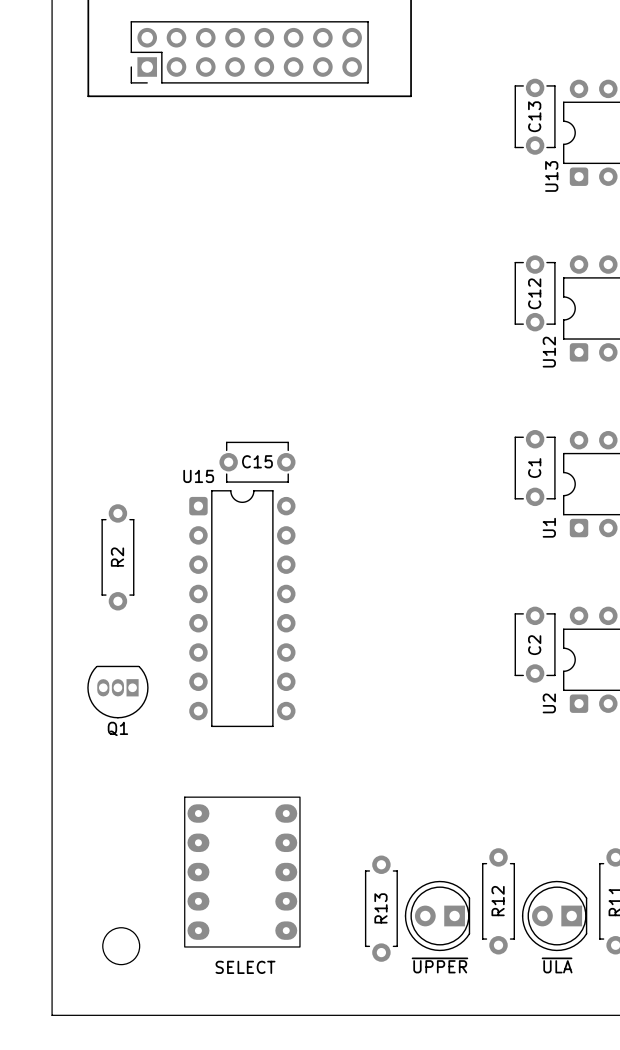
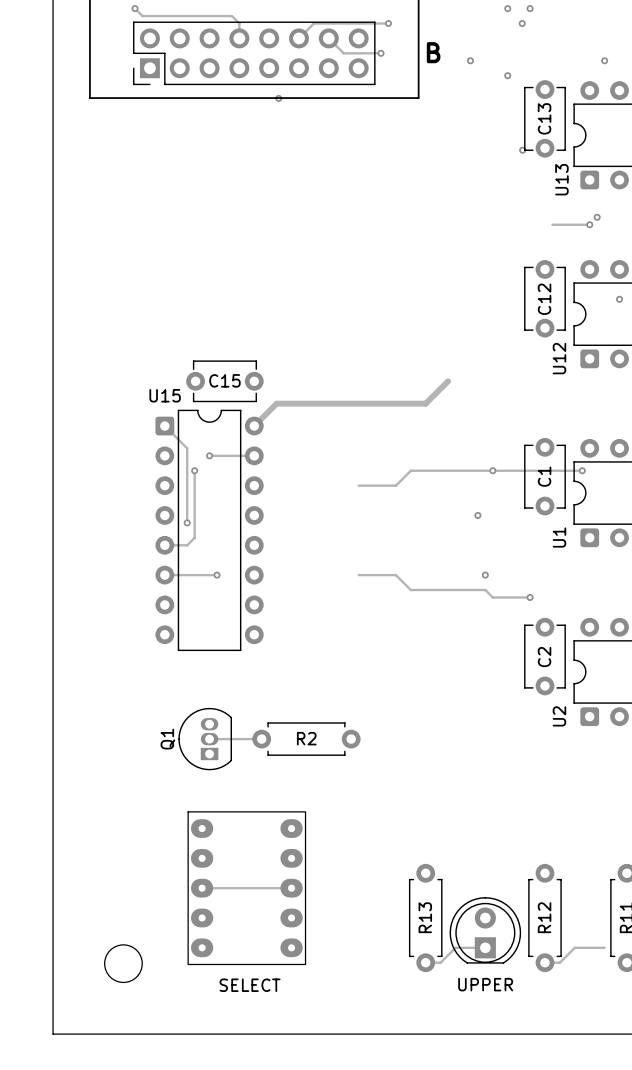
track: none -> (135, 8) (142, 16) (231, 16) (239, 23) (239, 38)
via: none -> (135, 8)
via: none -> (507, 8)
via: none -> (530, 8)
track: none -> (388, 23) (313, 23) (299, 38)
via: none -> (388, 23)
via: none -> (522, 23)
track: none -> (328, 38) (343, 53) (381, 53)
text: none -> B (433, 52)
via: none -> (381, 53)
via: none -> (470, 60)
via: none -> (604, 60)
via: none -> (507, 75)
via: none -> (278, 98)
via: none -> (522, 150)
via: none -> (597, 217)
track: none -> (552, 224) (589, 224)
via: none -> (589, 224)
via: none -> (619, 299)
track: none -> (448, 381) (425, 403) (276, 403) (254, 426)
track: none -> (164, 426) (187, 448) (187, 522)
track: none -> (209, 455) (254, 455)
via: none -> (209, 455)
track: none -> (194, 470) (194, 537) (187, 545) (164, 545)
via: none -> (194, 470)
C15 position: (257, 462) -> (224, 381)
via: none -> (492, 470)
track: none -> (582, 470) (410, 470) (395, 485) (358, 485)
via: none -> (582, 470)
via: none -> (477, 515)
via: none -> (187, 522)
R2 rotation: 0° (117, 557) -> 90° clockwise (306, 739)
R2 position: (117, 557) -> (306, 739)
track: none -> (164, 575) (217, 575)
via: none -> (217, 575)
track: none -> (358, 575) (395, 575) (410, 590) (485, 590) (492, 597) (530, 597)
via: none -> (485, 575)
via: none -> (530, 597)
U15 position: (242, 608) -> (209, 530)
Q1 rotation: 0° (117, 692) -> 90° clockwise (205, 739)
Q1 position: (117, 692) -> (205, 739)
track: none -> (209, 739) (261, 739)
track: none -> (202, 888) (291, 888)
R12 position: (498, 901) -> (544, 917)
R13 position: (381, 908) -> (425, 917)
part: none -> UPPER (485, 930)
part: ~{UPPER} (437, 915) -> none
part: ~{ULA} (554, 915) -> none
track: none -> (485, 947) (455, 947) (440, 962) (425, 962)
track: none -> (604, 947) (574, 947) (559, 962) (544, 962)

